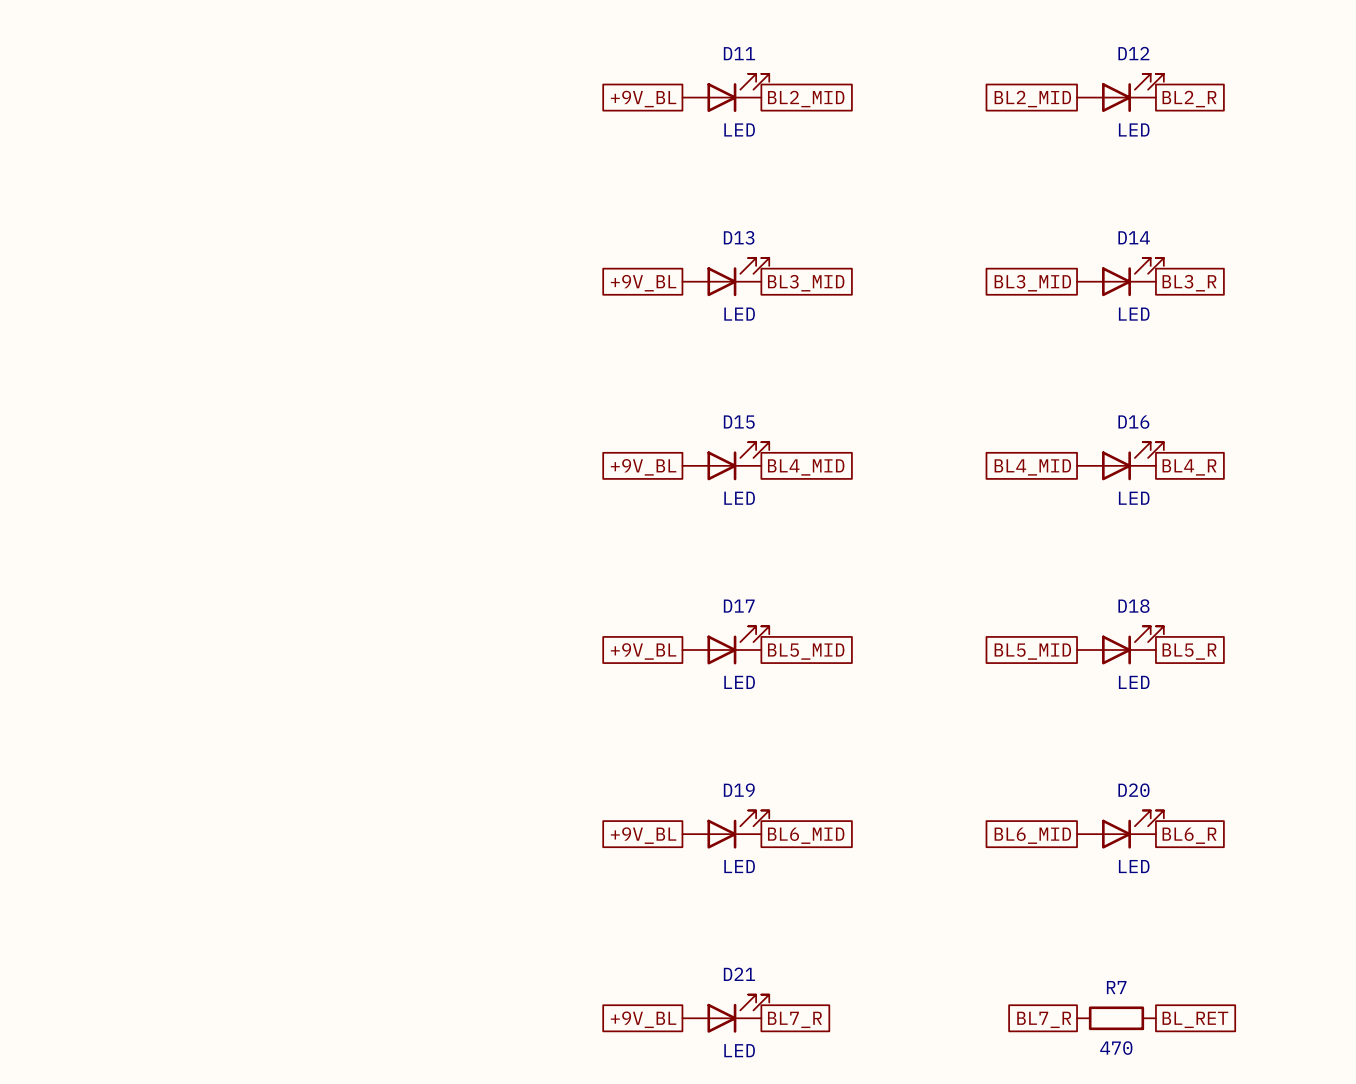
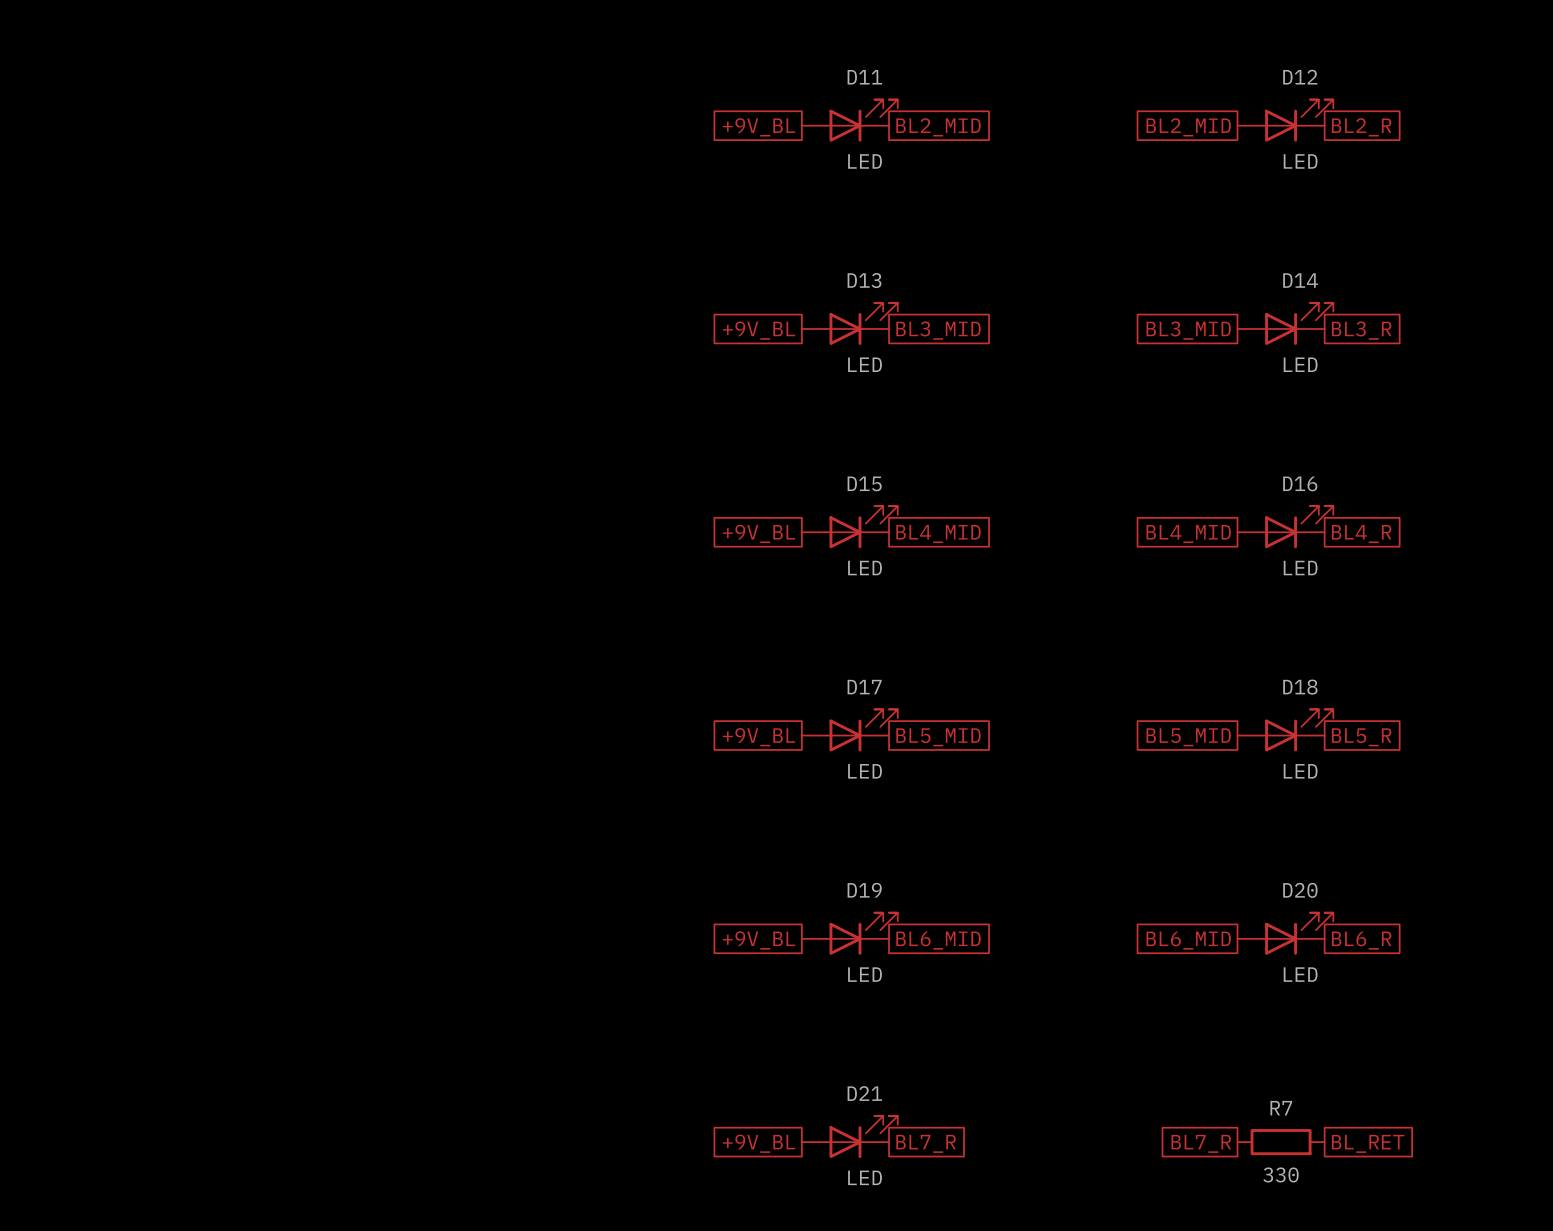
R7 value: 470 (1116, 1048) -> 330 (1280, 1174)

